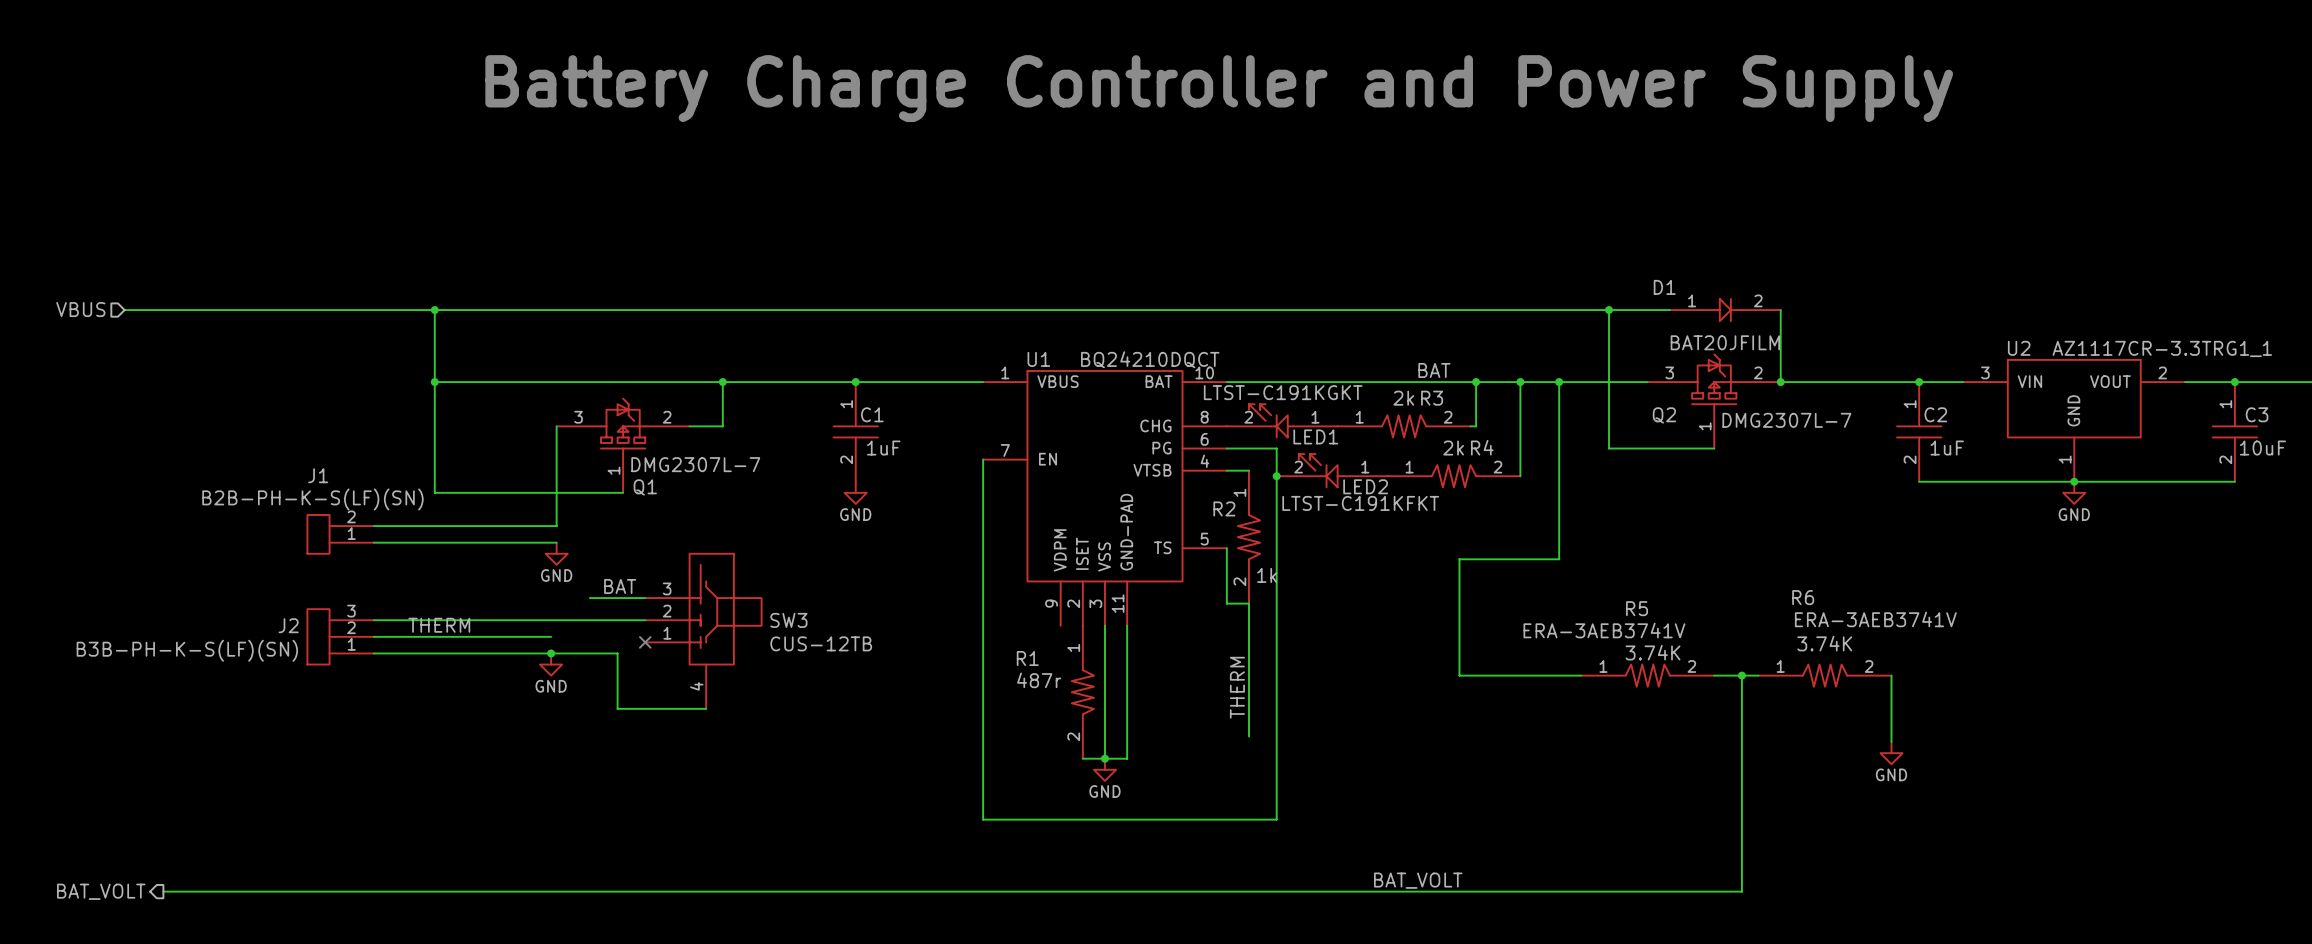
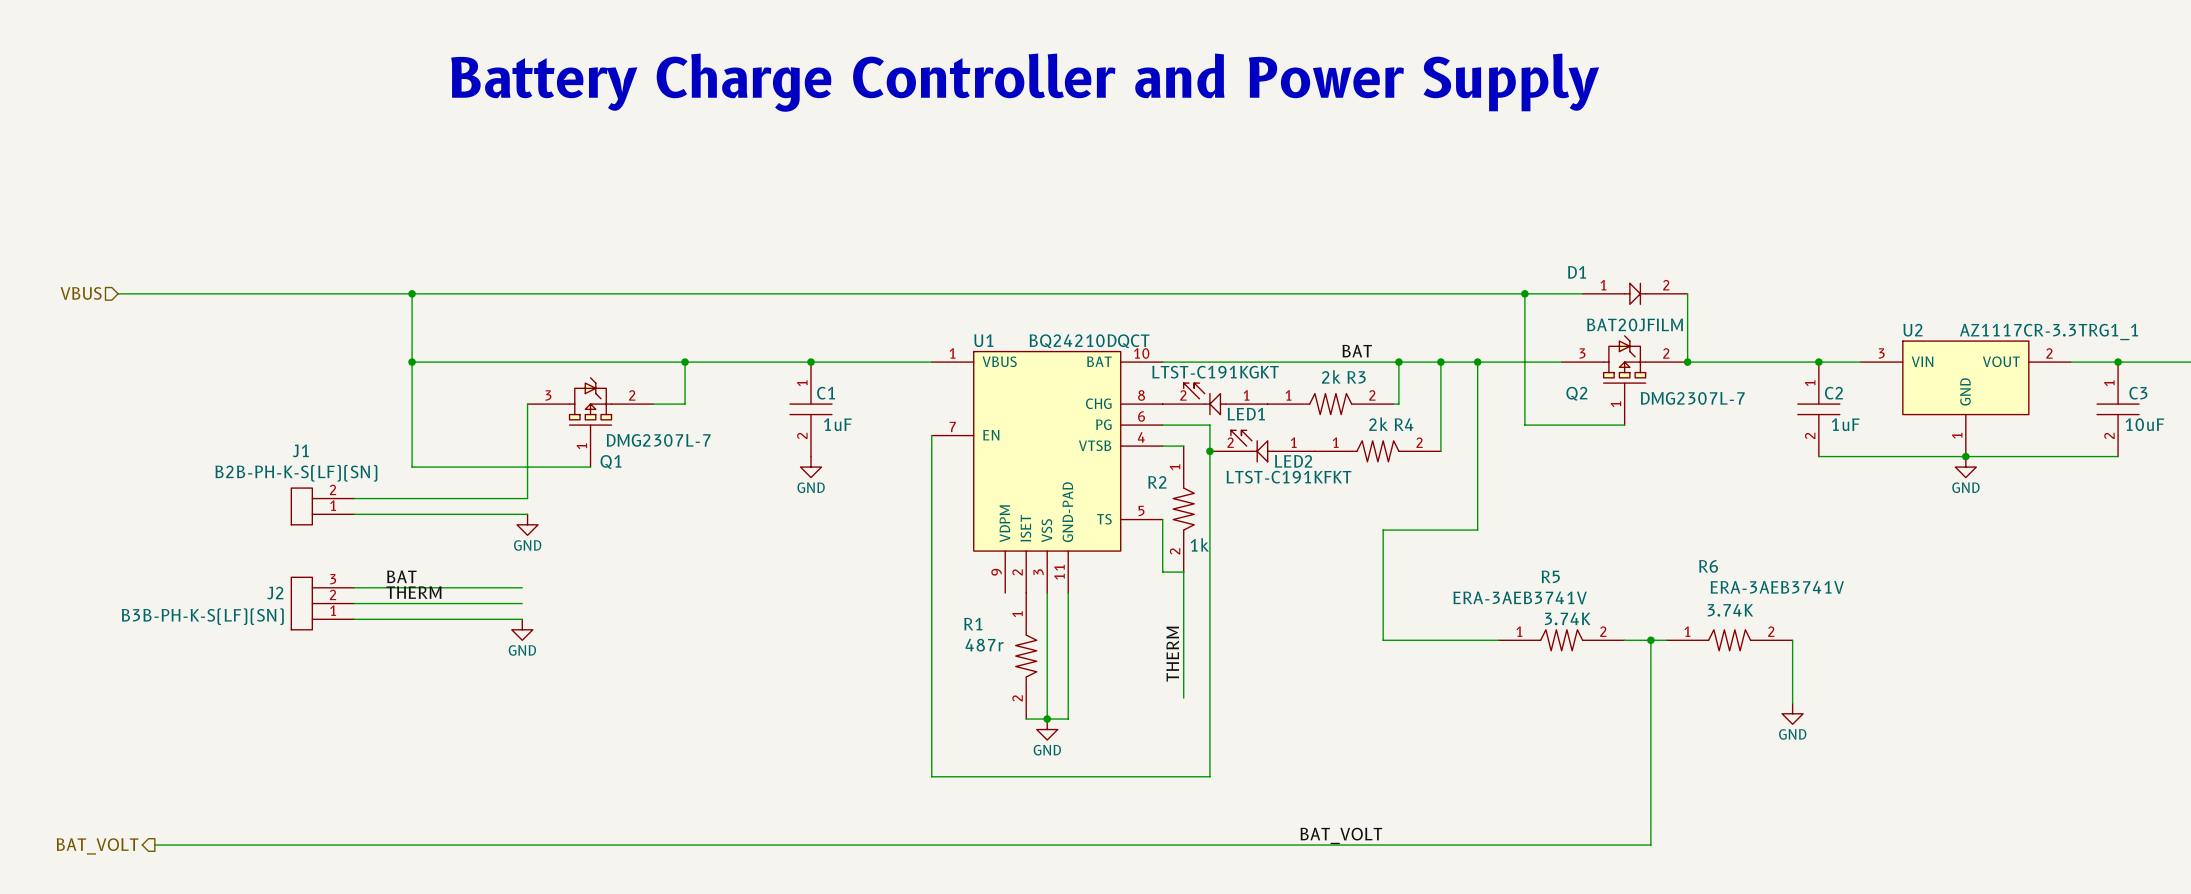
label position: BAT (620, 586) -> BAT (401, 576)
wire: (589, 598) (645, 598) -> none
wire: (551, 620) (645, 620) -> none
SW3: CUS-12TB (703, 631) -> none
no-connect mark: (645, 642) -> none
wire: (551, 653) (617, 653) (617, 708) (706, 708) -> none
junction: (551, 653) -> none

